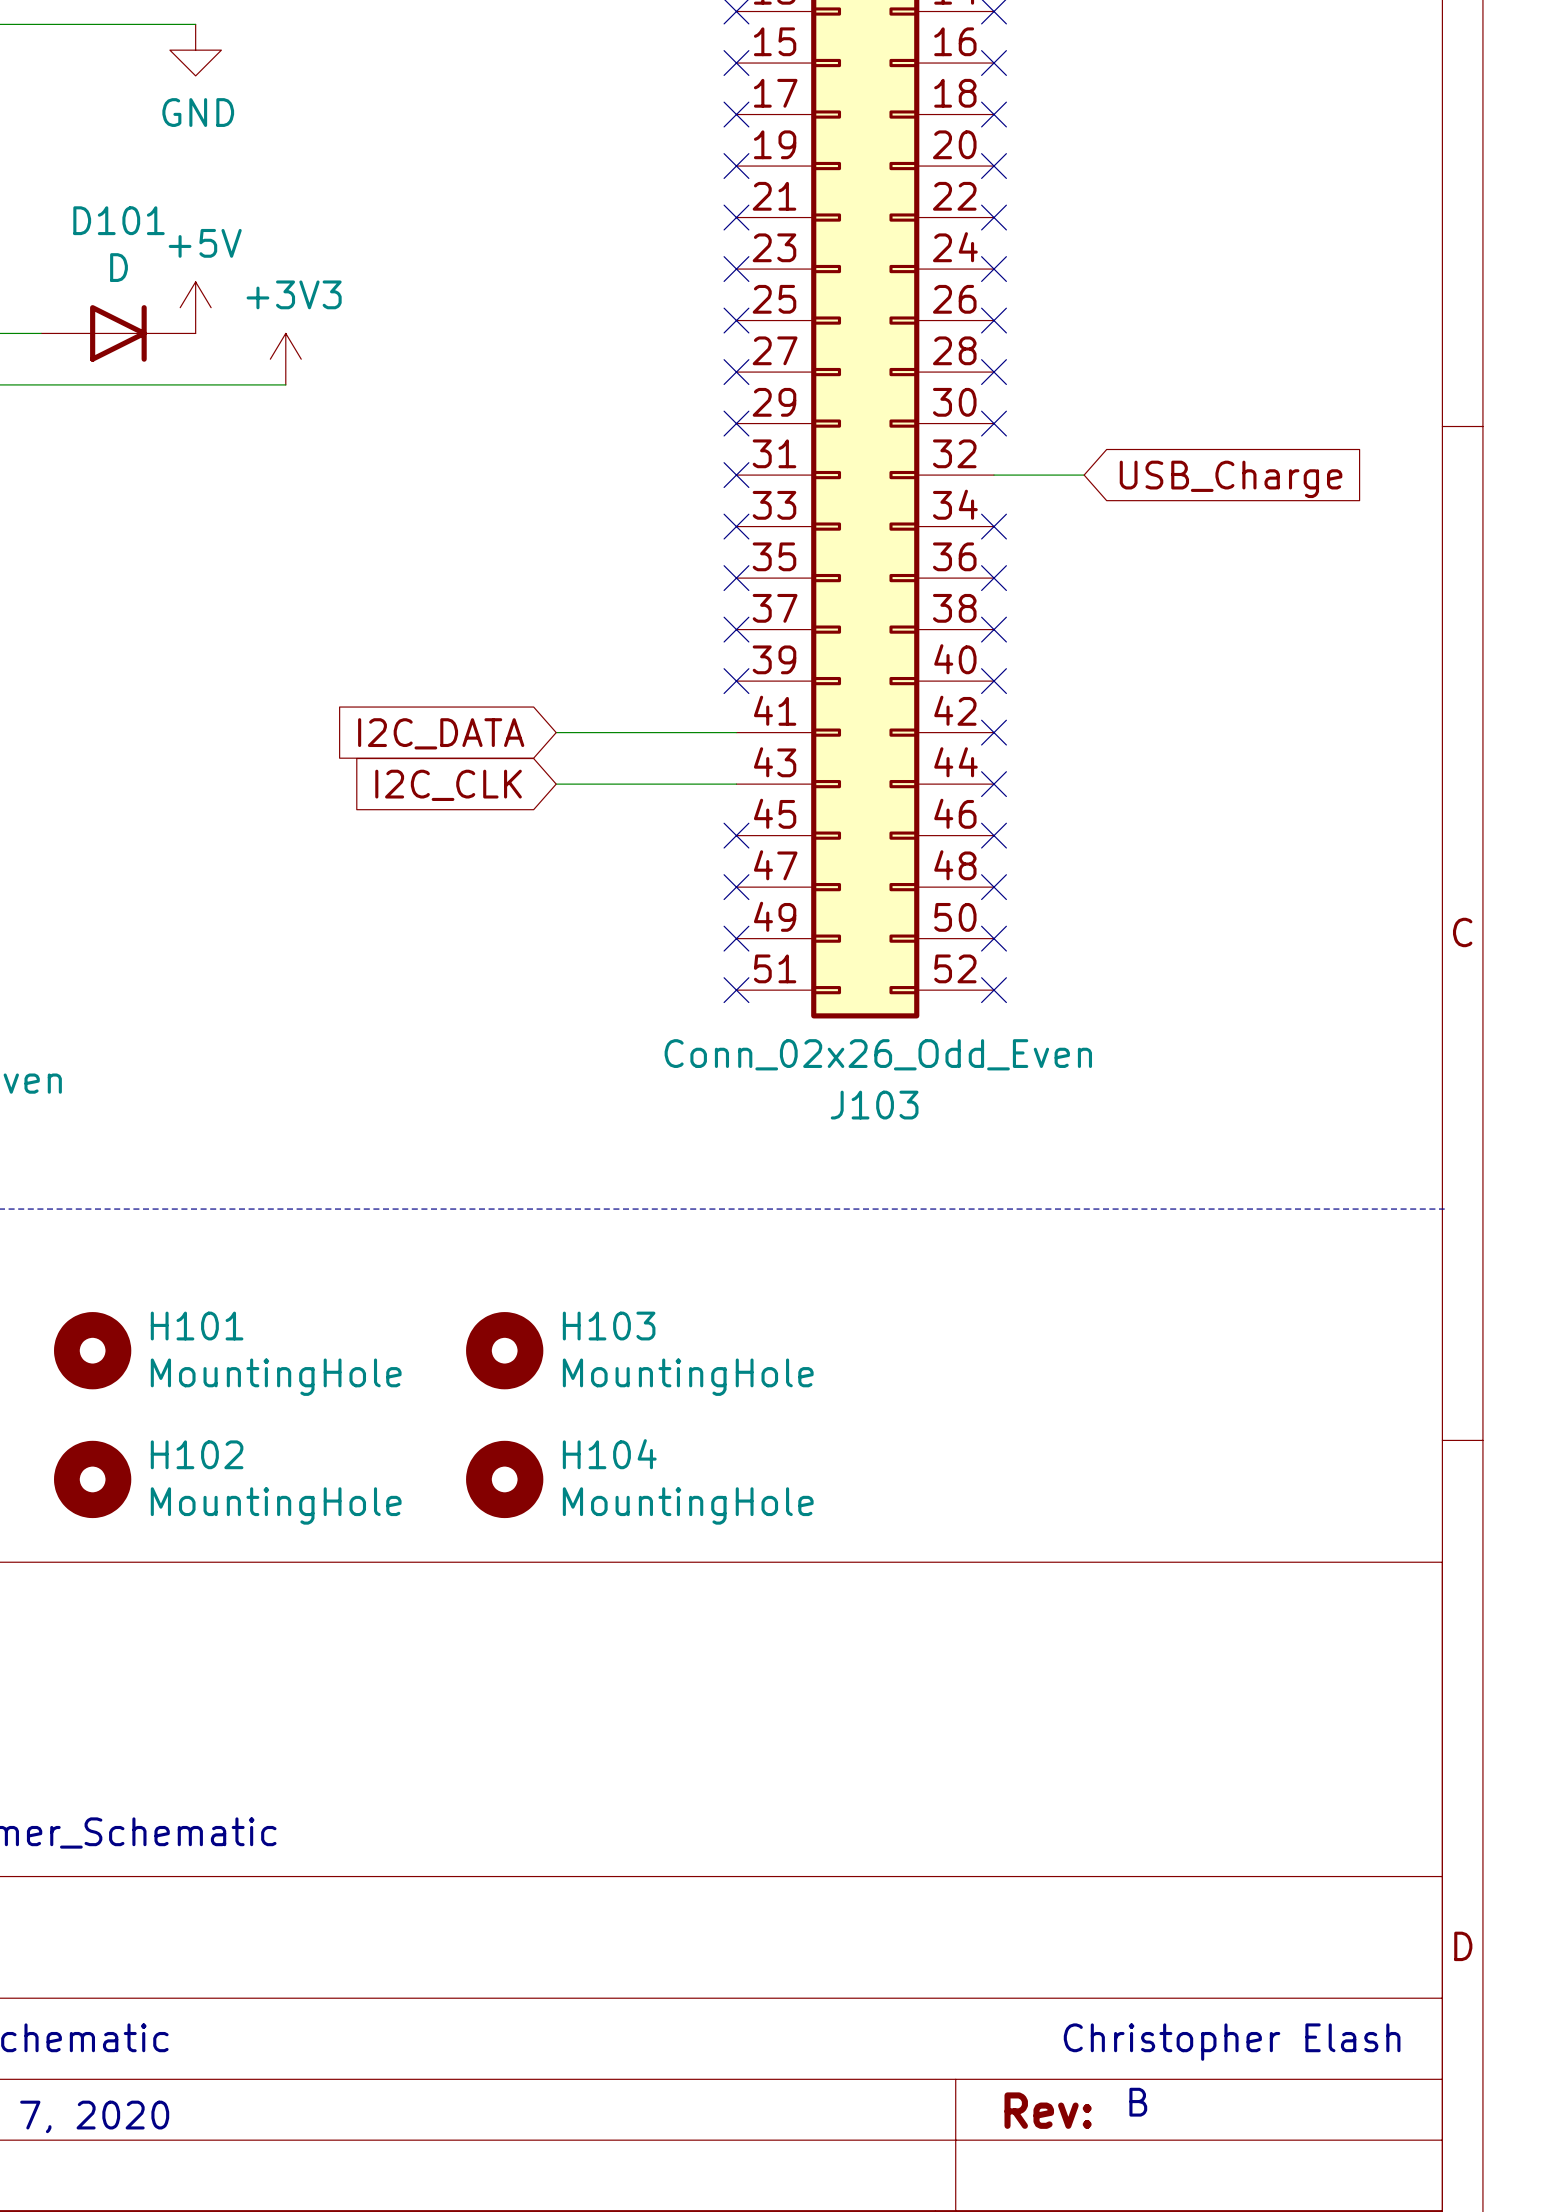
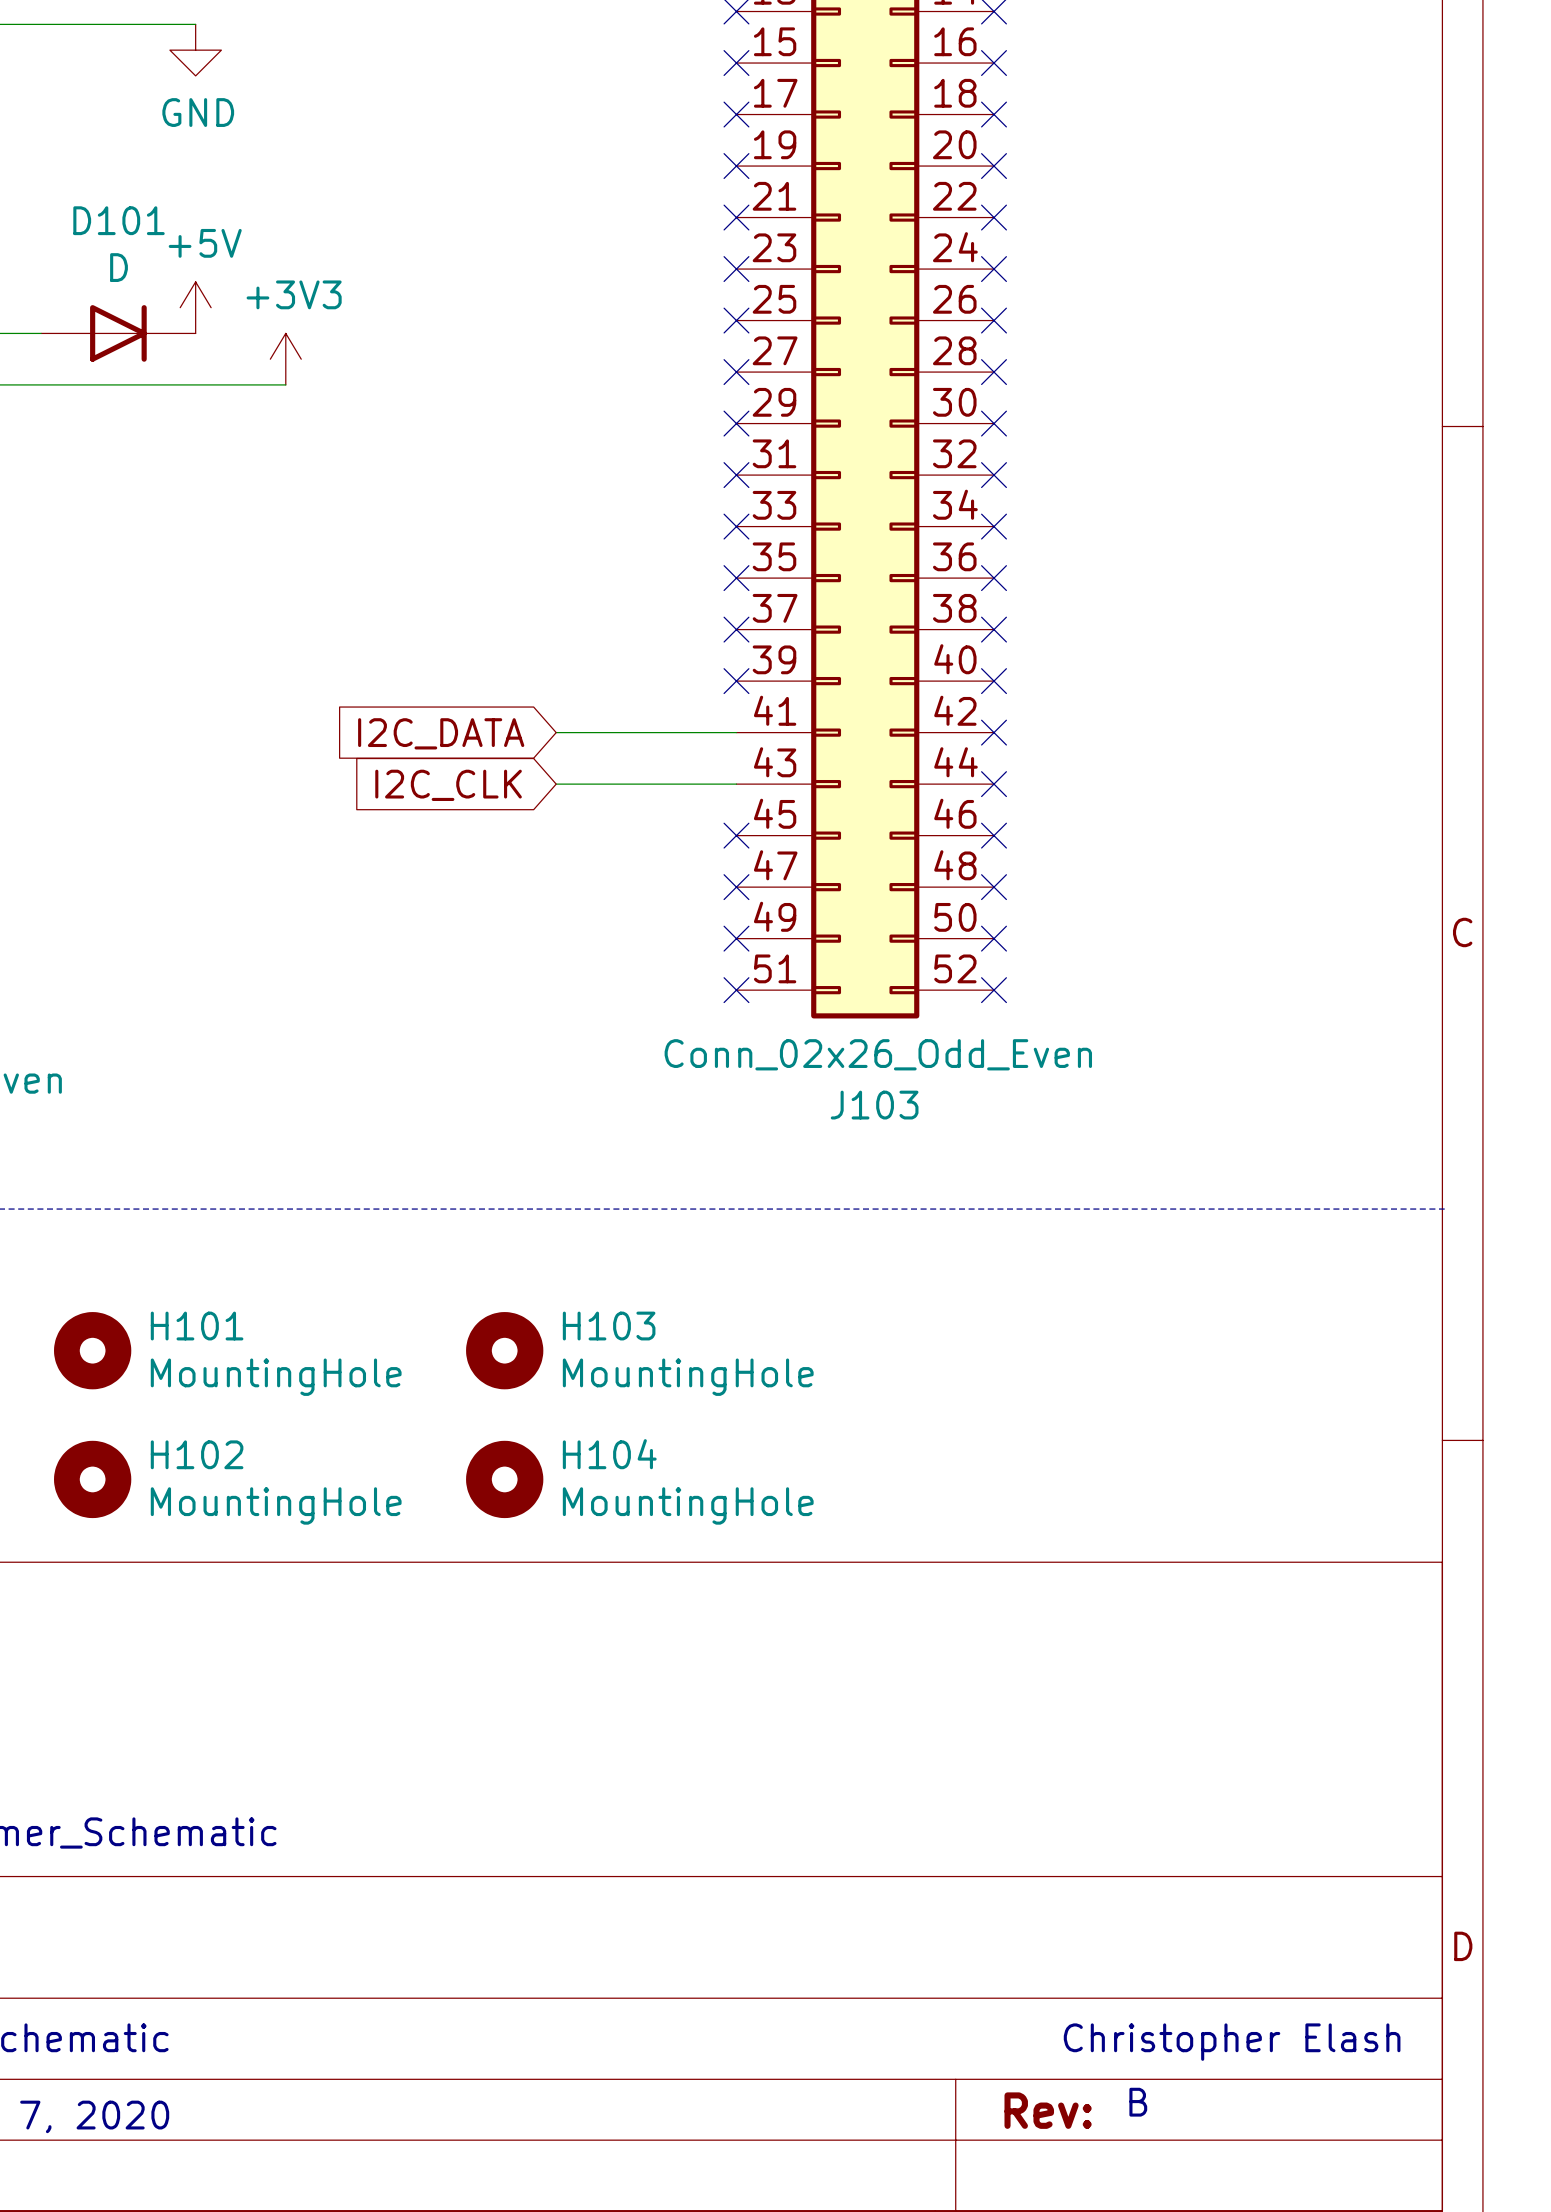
wire: (994, 475) (1084, 475) -> none
no-connect mark: none -> (994, 475)
global label: USB_Charge (1231, 479) -> none

